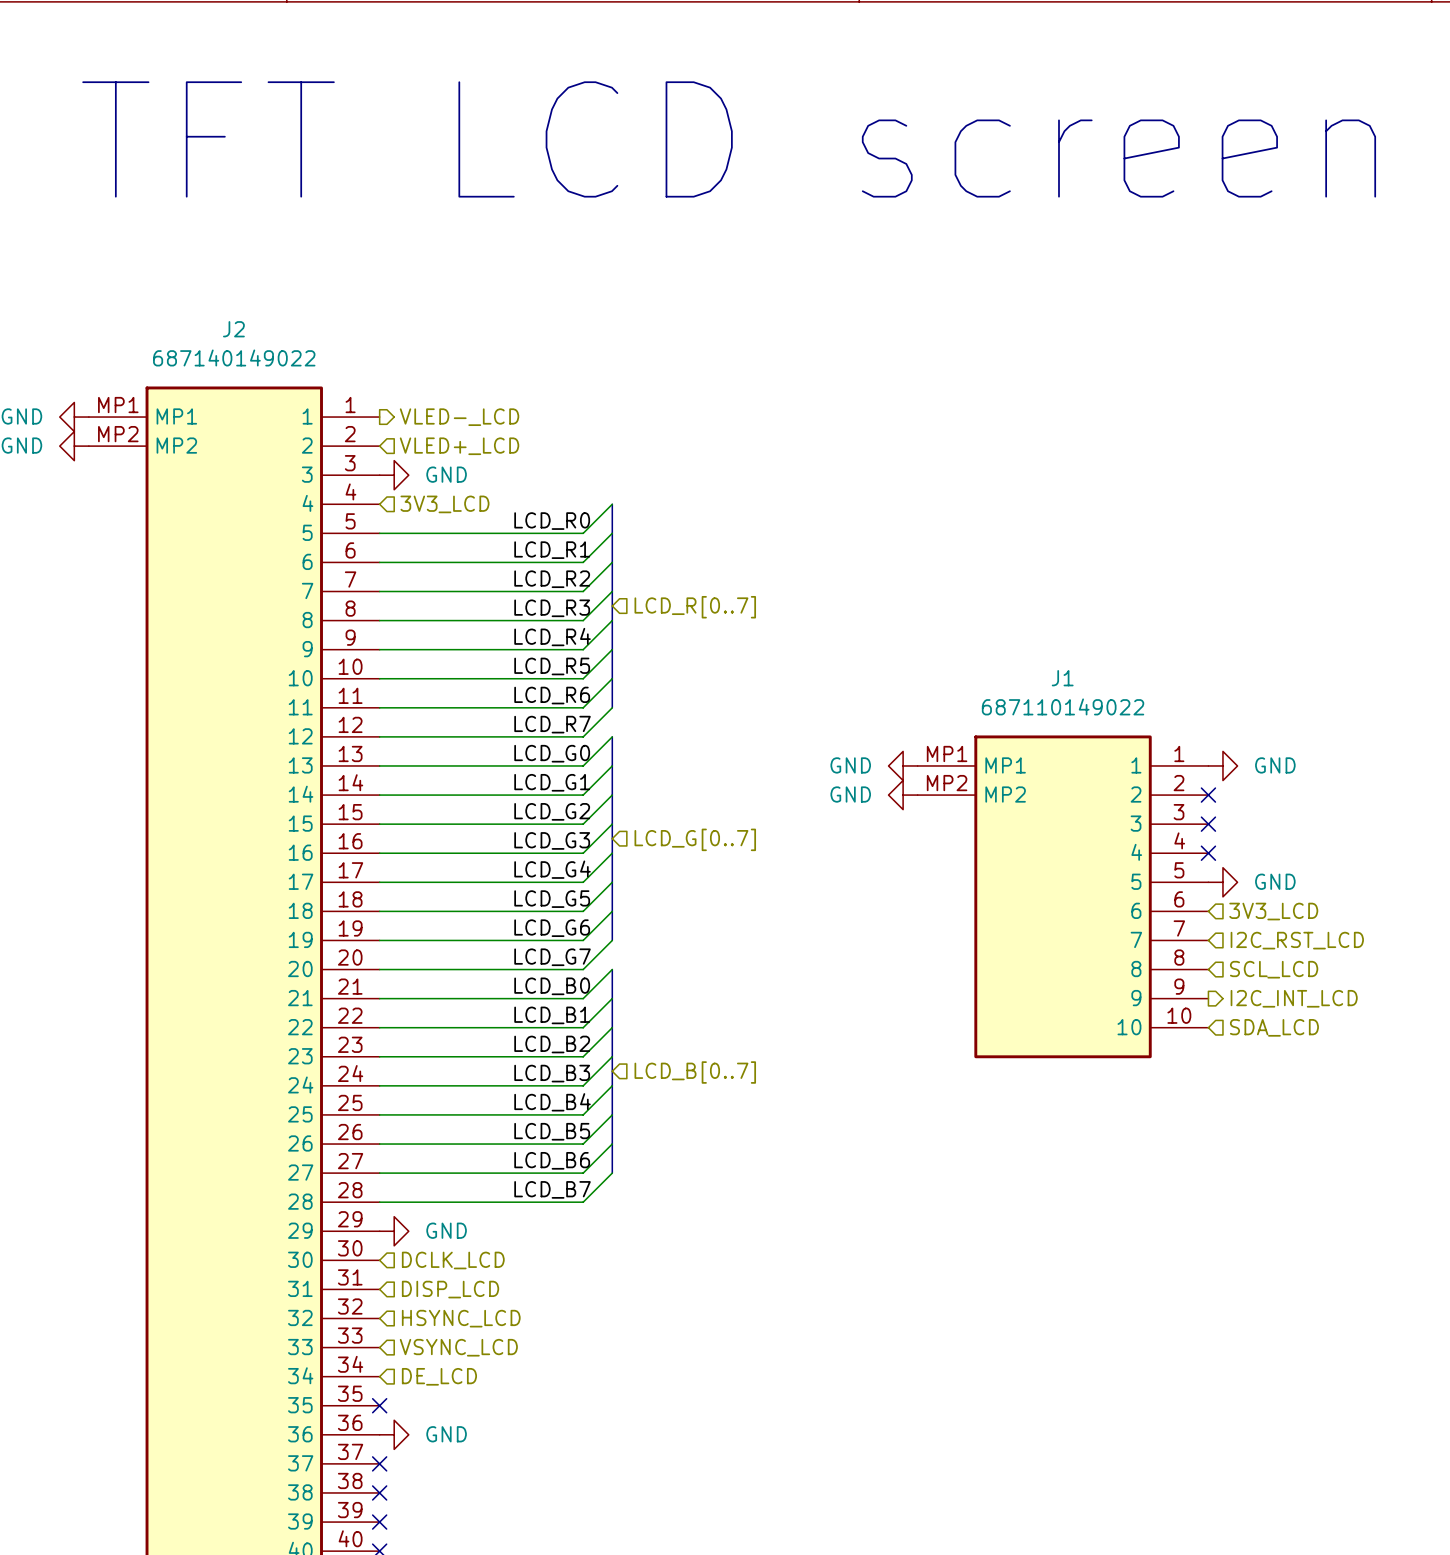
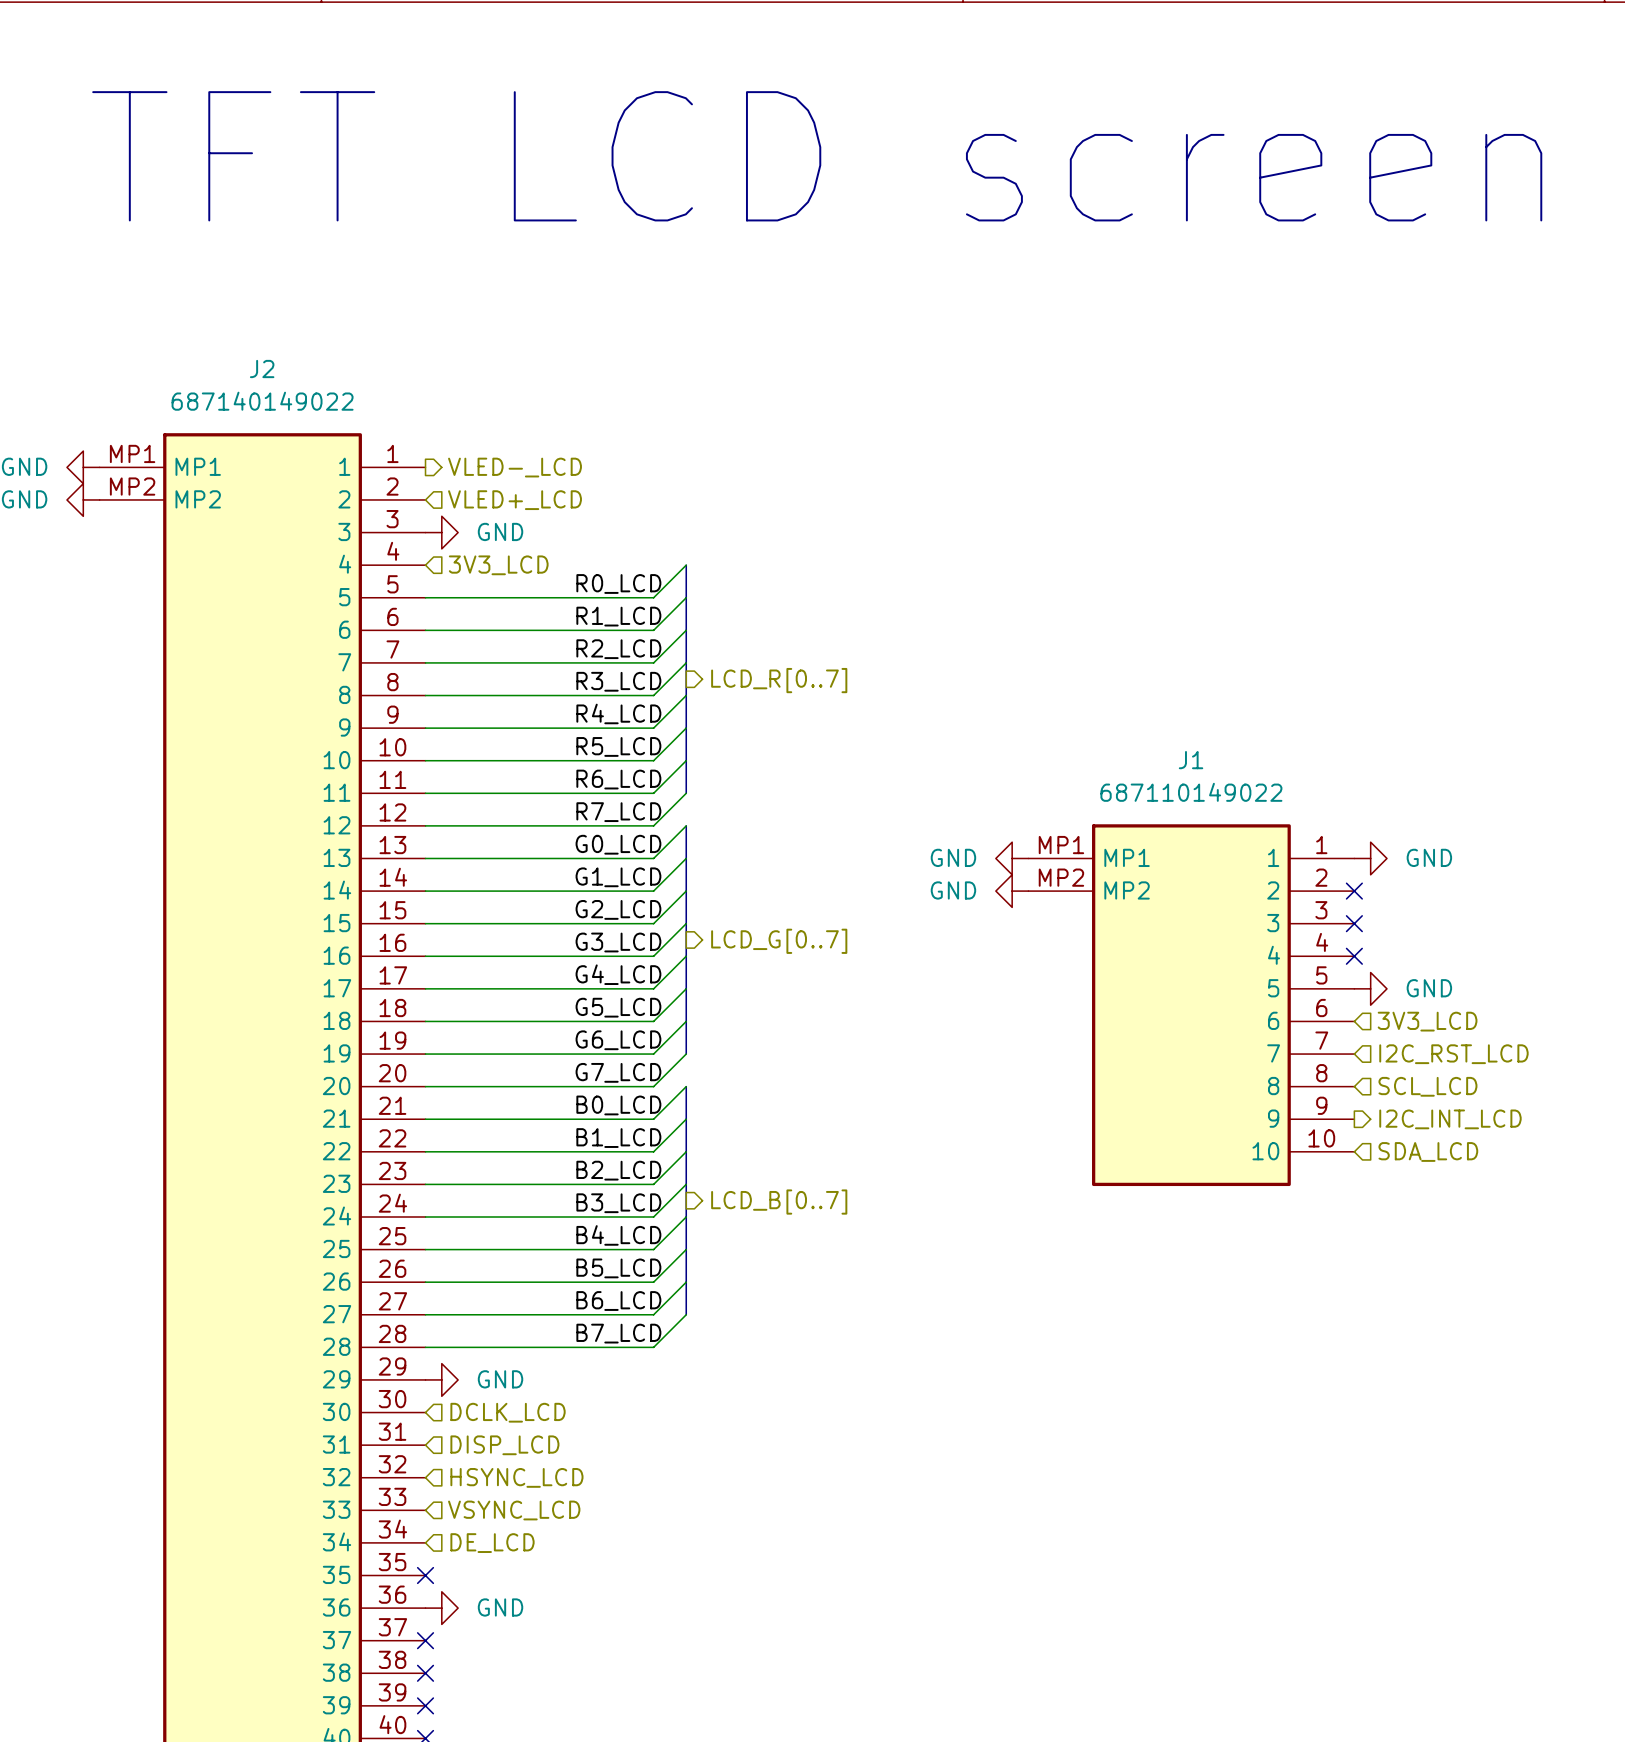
label: LCD_R0 (552, 521) -> R0_LCD (618, 583)
label: LCD_R1 (552, 550) -> R1_LCD (618, 616)
label: LCD_R2 (552, 579) -> R2_LCD (618, 649)
hierarchical label shape: input (695, 607) -> output (779, 680)
label: LCD_R3 (552, 608) -> R3_LCD (618, 681)
label: LCD_R4 (552, 637) -> R4_LCD (618, 713)
label: LCD_R5 (552, 666) -> R5_LCD (618, 746)
label: LCD_R6 (552, 695) -> R6_LCD (618, 779)
label: LCD_R7 (552, 724) -> R7_LCD (618, 812)
label: LCD_G0 (552, 753) -> G0_LCD (618, 844)
label: LCD_G1 (552, 782) -> G1_LCD (618, 877)
label: LCD_G2 (552, 811) -> G2_LCD (618, 909)
hierarchical label shape: input (695, 839) -> output (779, 941)
label: LCD_G3 (552, 840) -> G3_LCD (618, 942)
label: LCD_G4 (552, 869) -> G4_LCD (618, 974)
label: LCD_G5 (552, 899) -> G5_LCD (618, 1007)
label: LCD_G6 (552, 928) -> G6_LCD (618, 1040)
label: LCD_G7 (552, 957) -> G7_LCD (618, 1072)
label: LCD_B0 (552, 986) -> B0_LCD (618, 1105)
label: LCD_B1 (552, 1015) -> B1_LCD (618, 1138)
label: LCD_B2 (552, 1044) -> B2_LCD (618, 1170)
hierarchical label shape: input (695, 1072) -> output (779, 1202)
label: LCD_B3 (552, 1073) -> B3_LCD (618, 1203)
label: LCD_B4 (552, 1102) -> B4_LCD (618, 1235)
label: LCD_B5 (552, 1131) -> B5_LCD (618, 1268)
label: LCD_B6 (552, 1160) -> B6_LCD (618, 1301)
label: LCD_B7 (552, 1189) -> B7_LCD (618, 1333)

